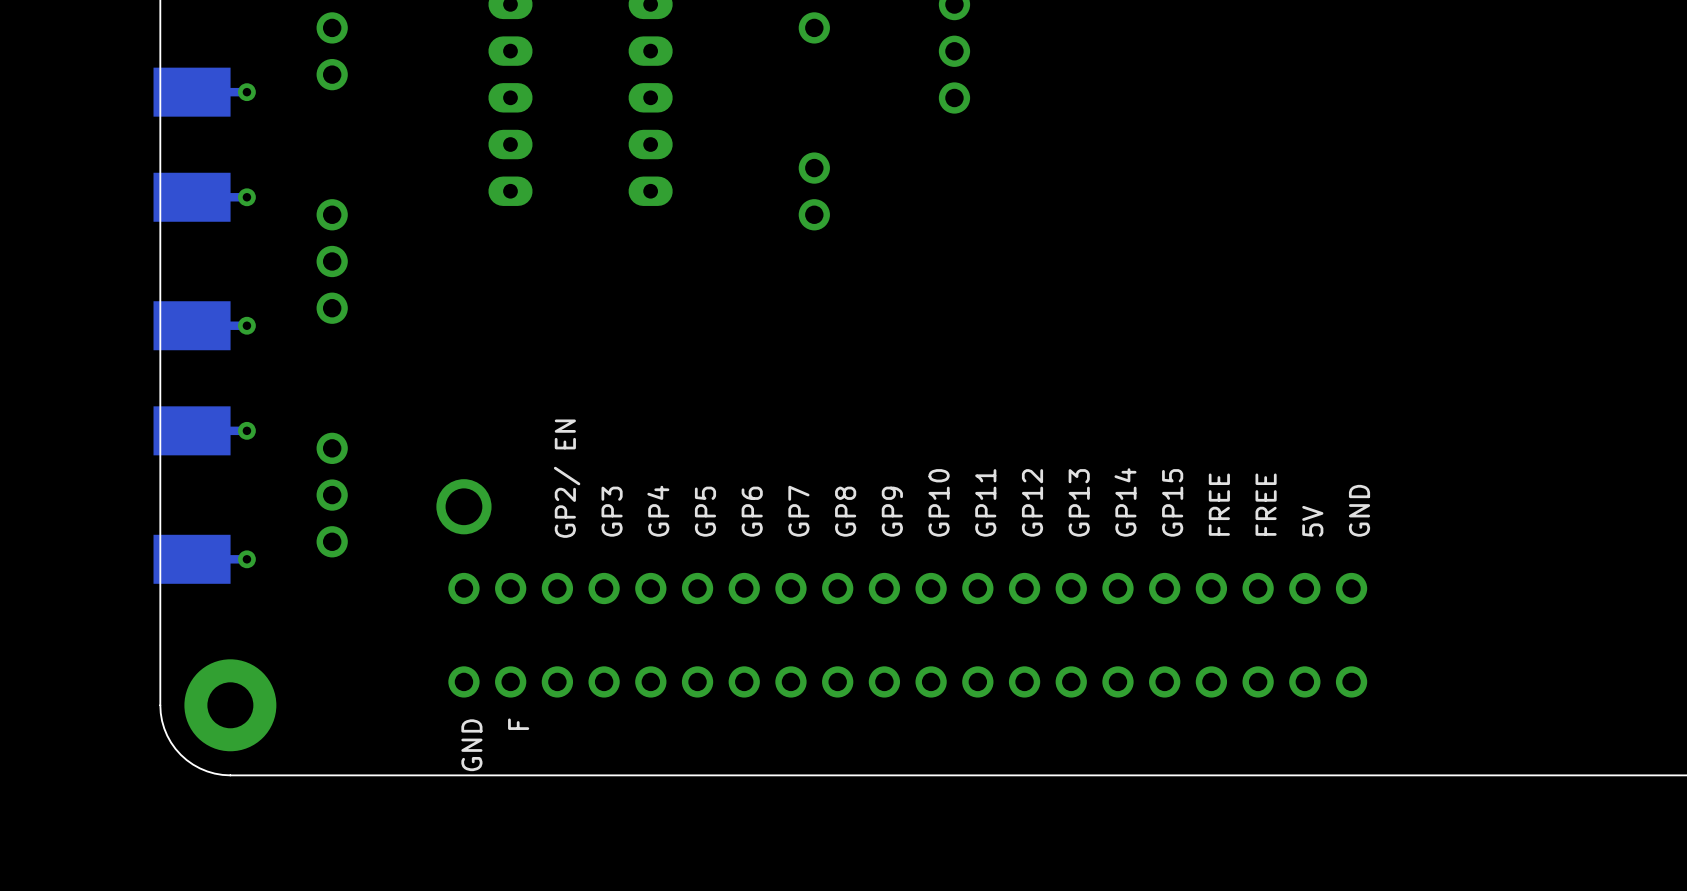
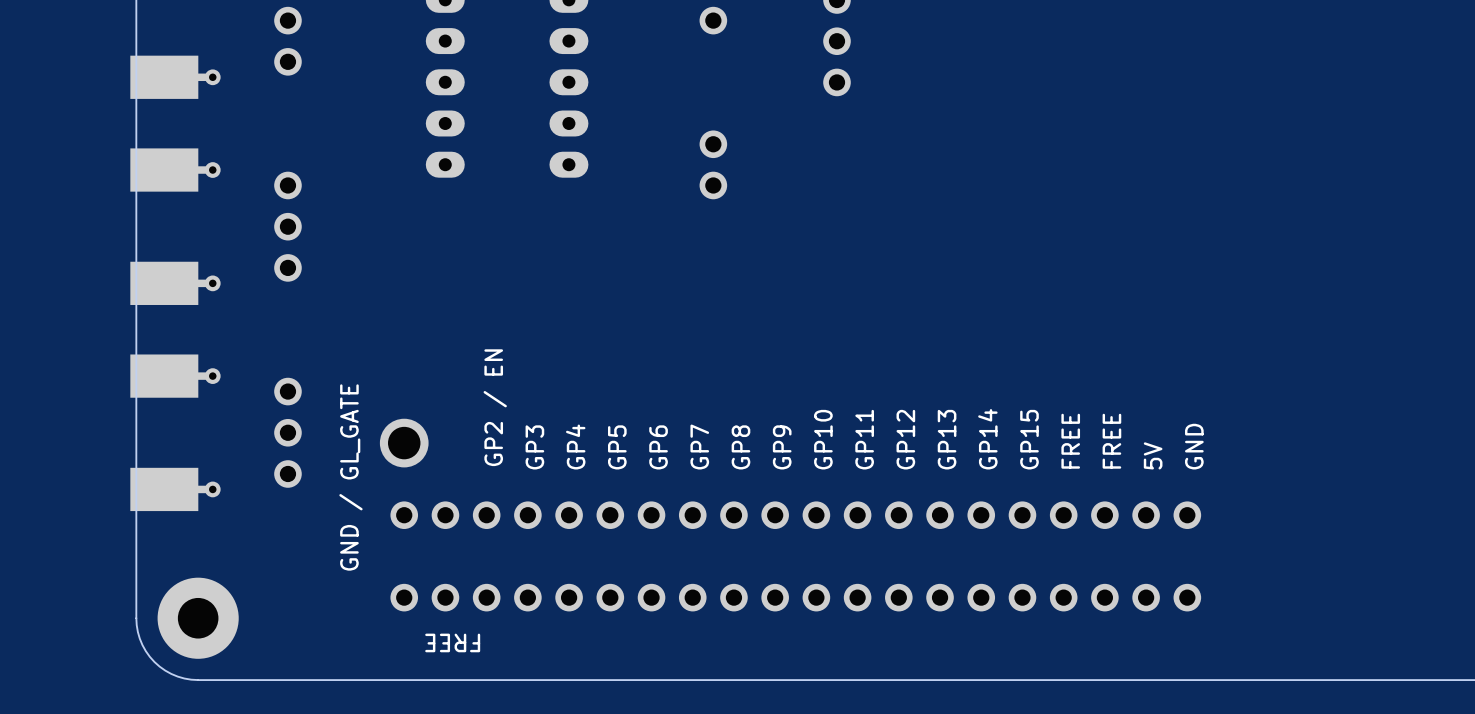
text: GP2/ EN (567, 478) -> GP2 / EN (495, 407)
text: none -> GND / GL_GATE (350, 477)
text: F (518, 724) -> FREE (452, 642)
text: GND (471, 745) -> none

